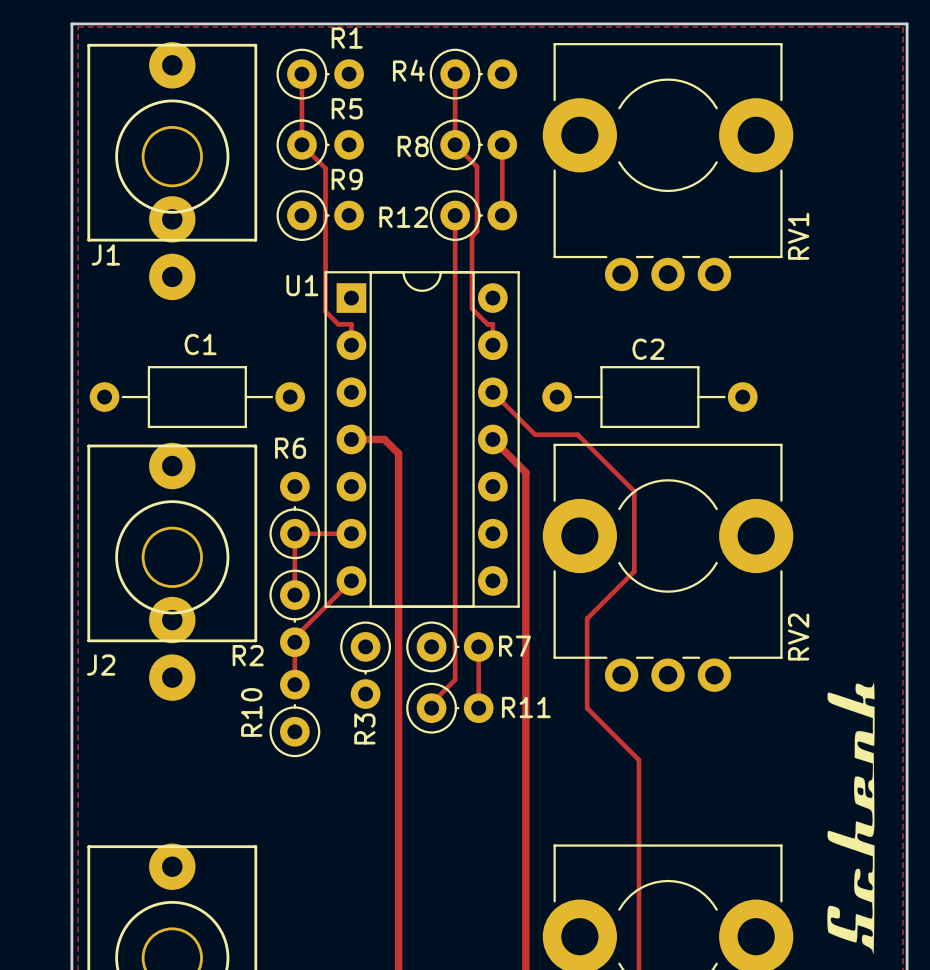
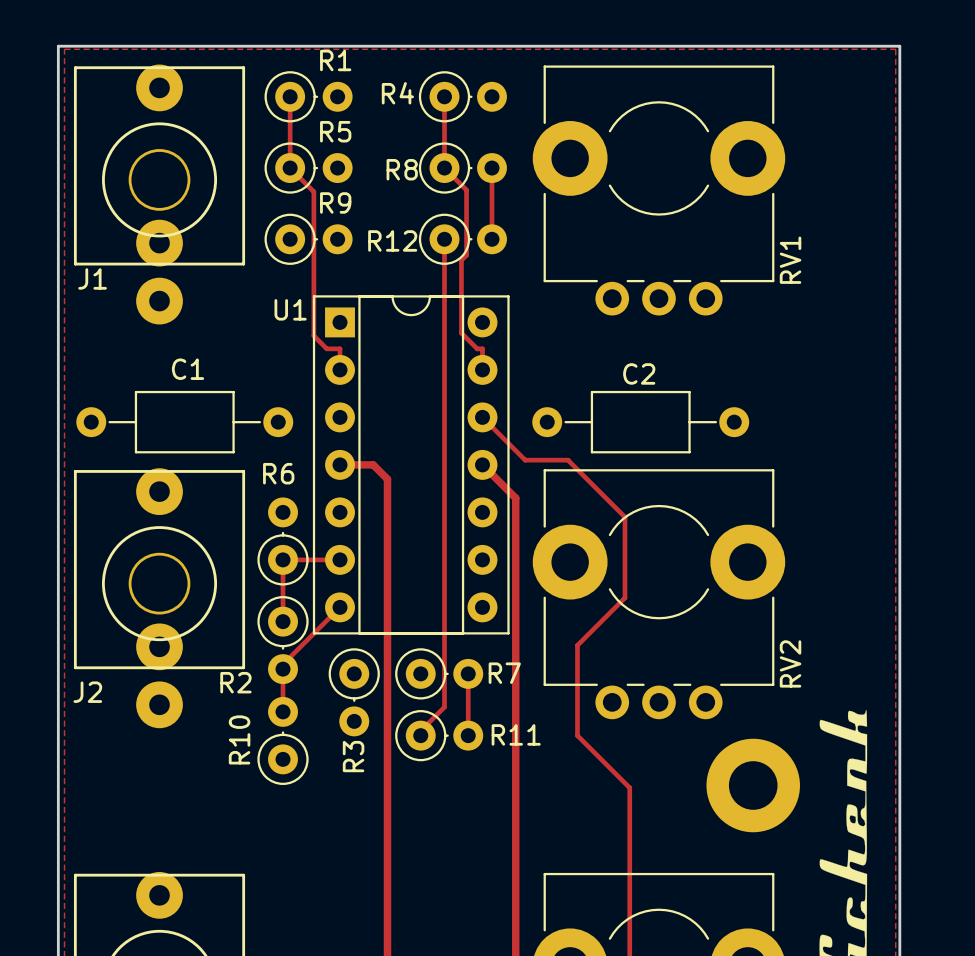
part: none -> (753, 785)

